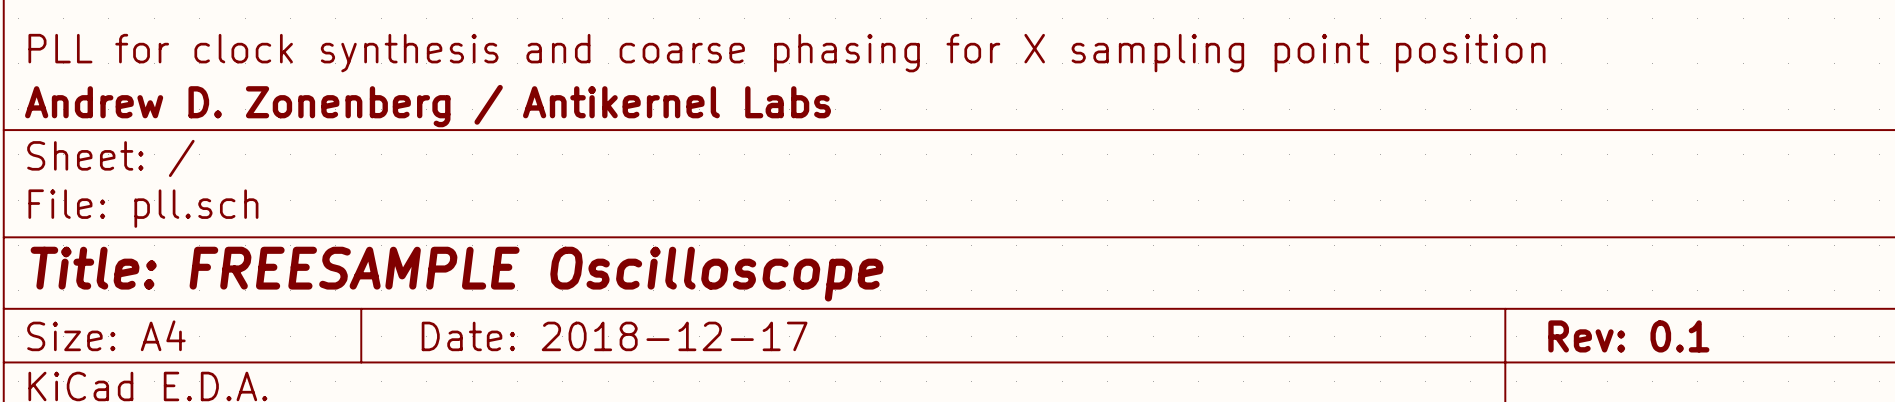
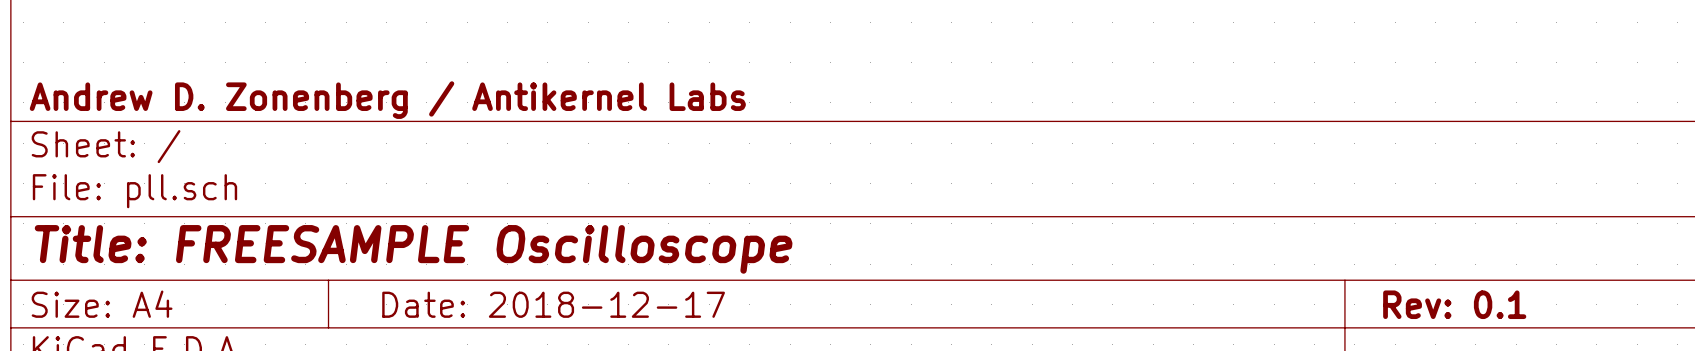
title block: PLL for clock synthesis and coarse phasing for X sampling point position (786, 53) -> none

